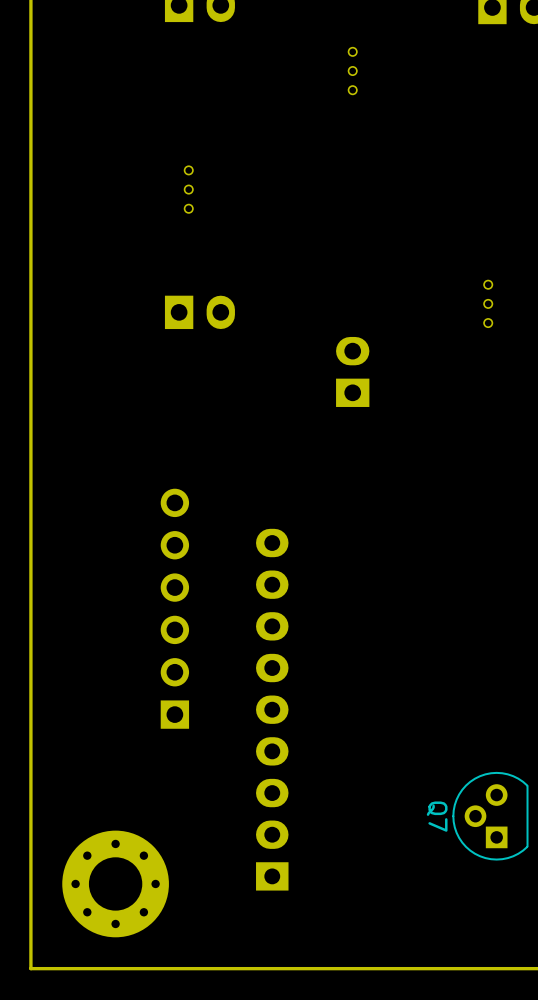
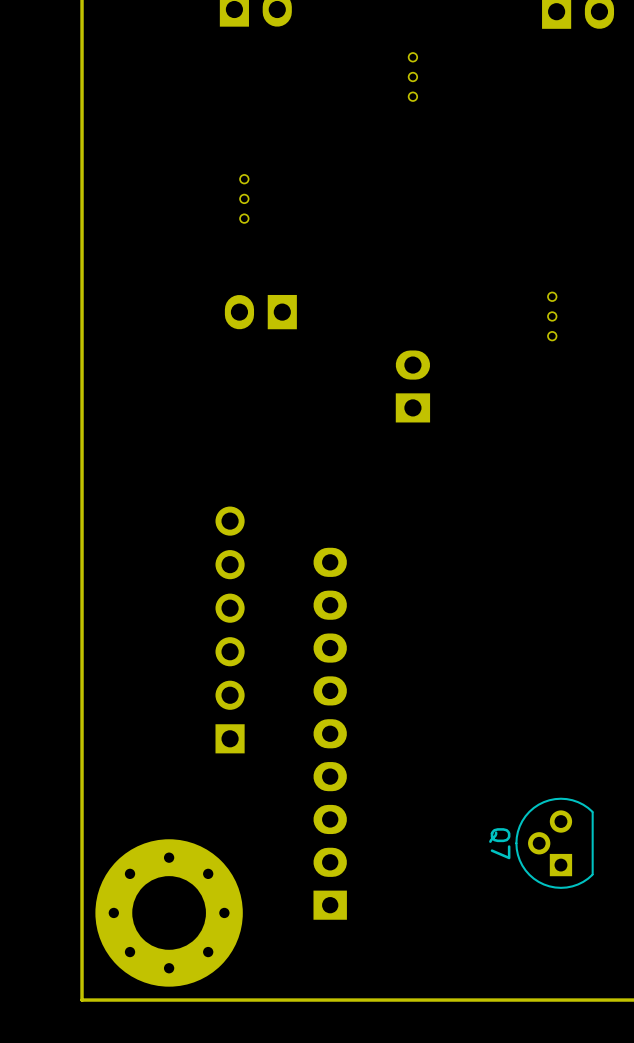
part rotation: 0° (199, 312) -> 180° (260, 312)
part footprint: [62, 830, 169, 938] -> [95, 839, 243, 987]

